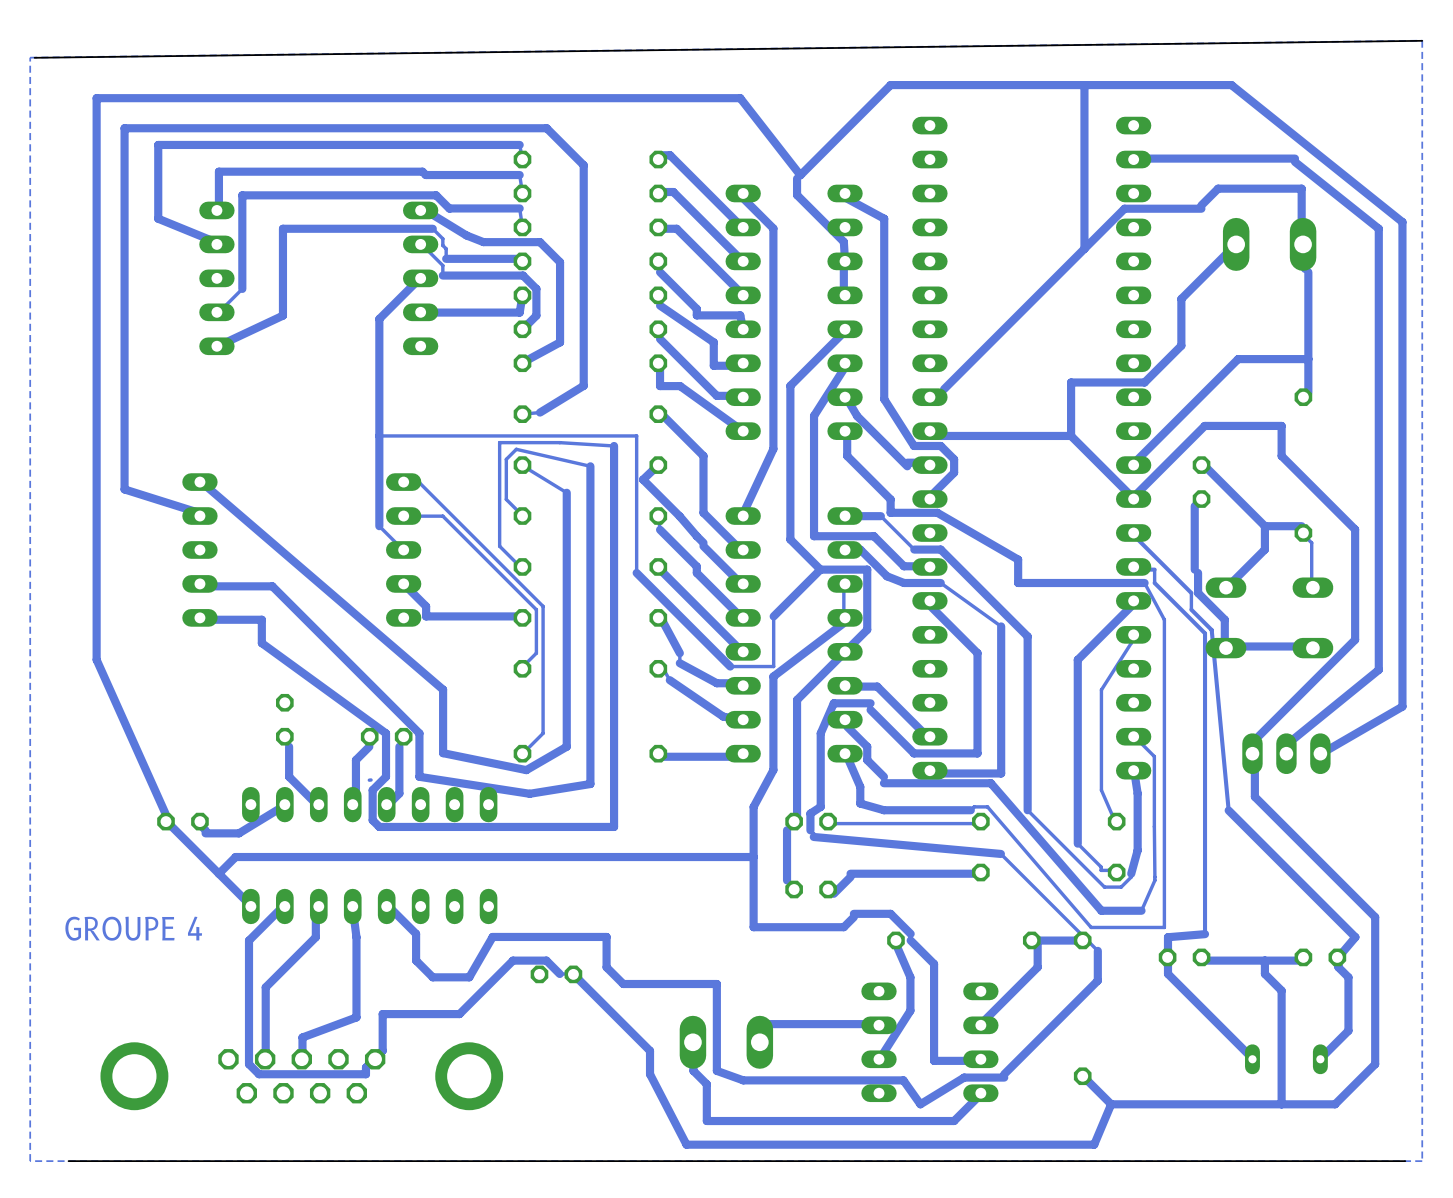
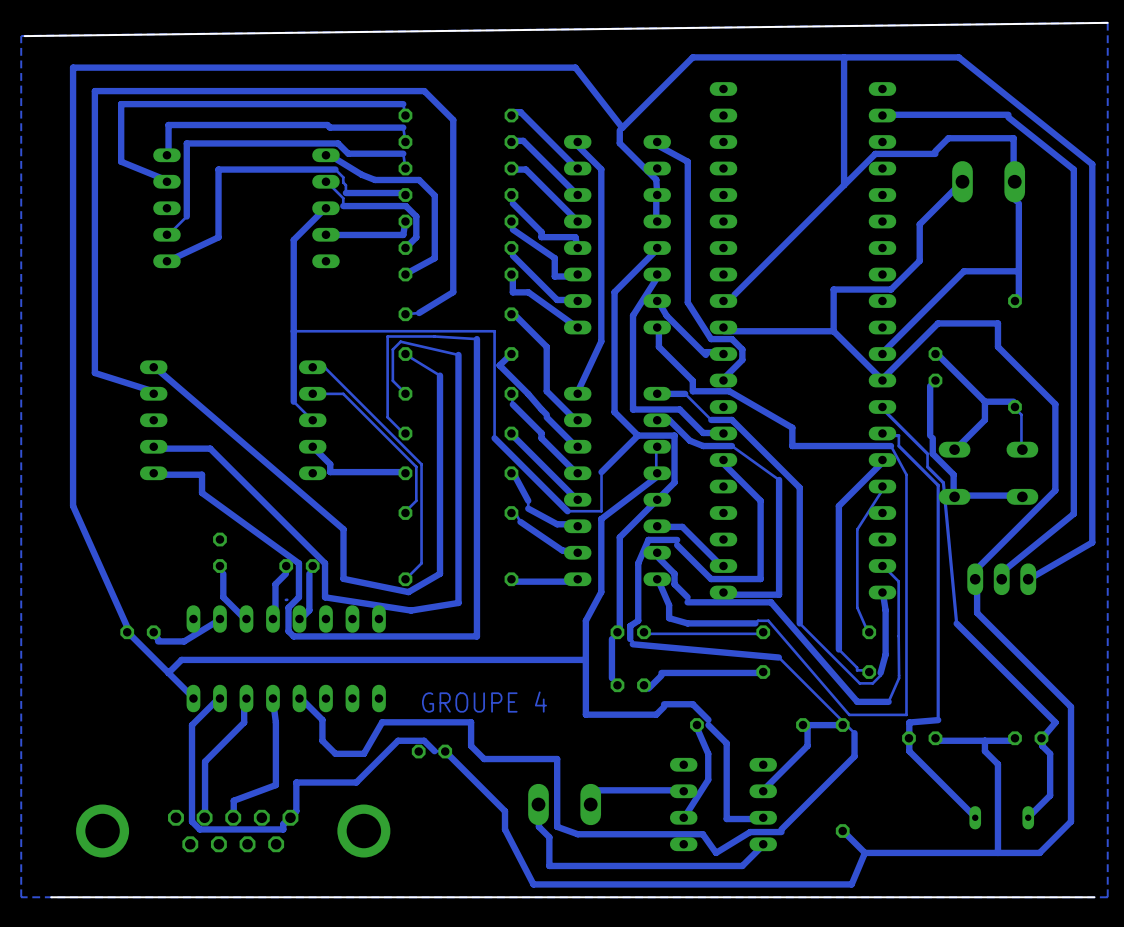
text: none -> GROUPE 4 (484, 702)
text: GROUPE 4 (133, 928) -> none

